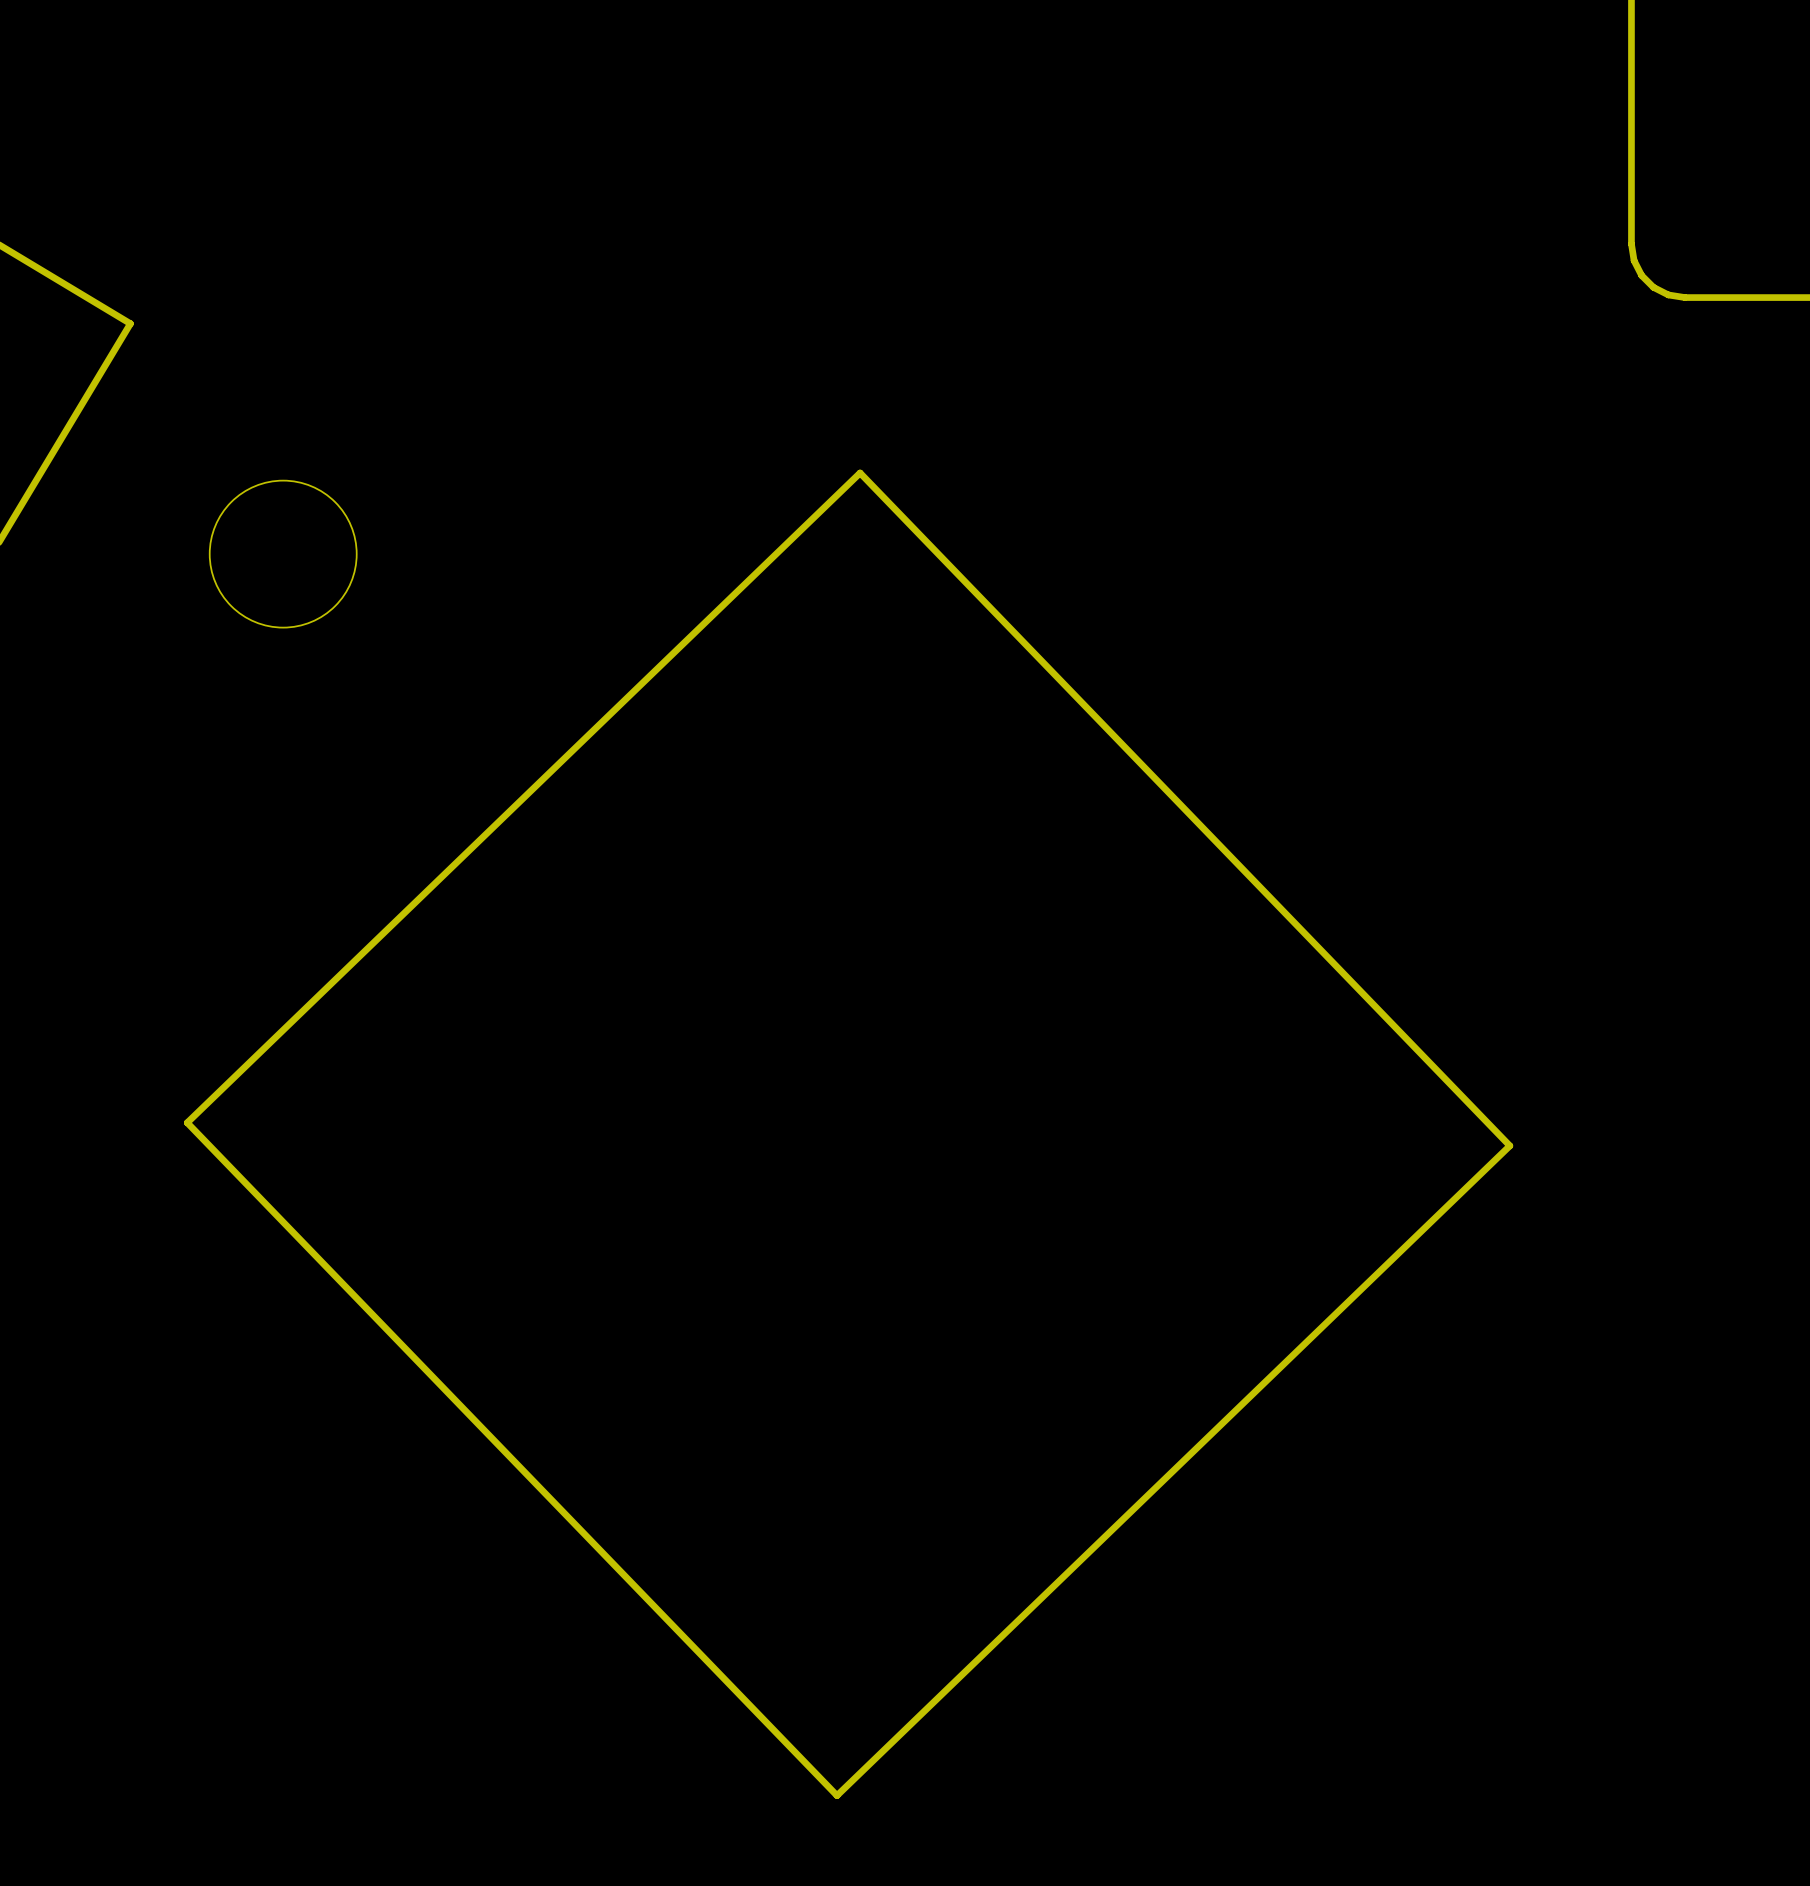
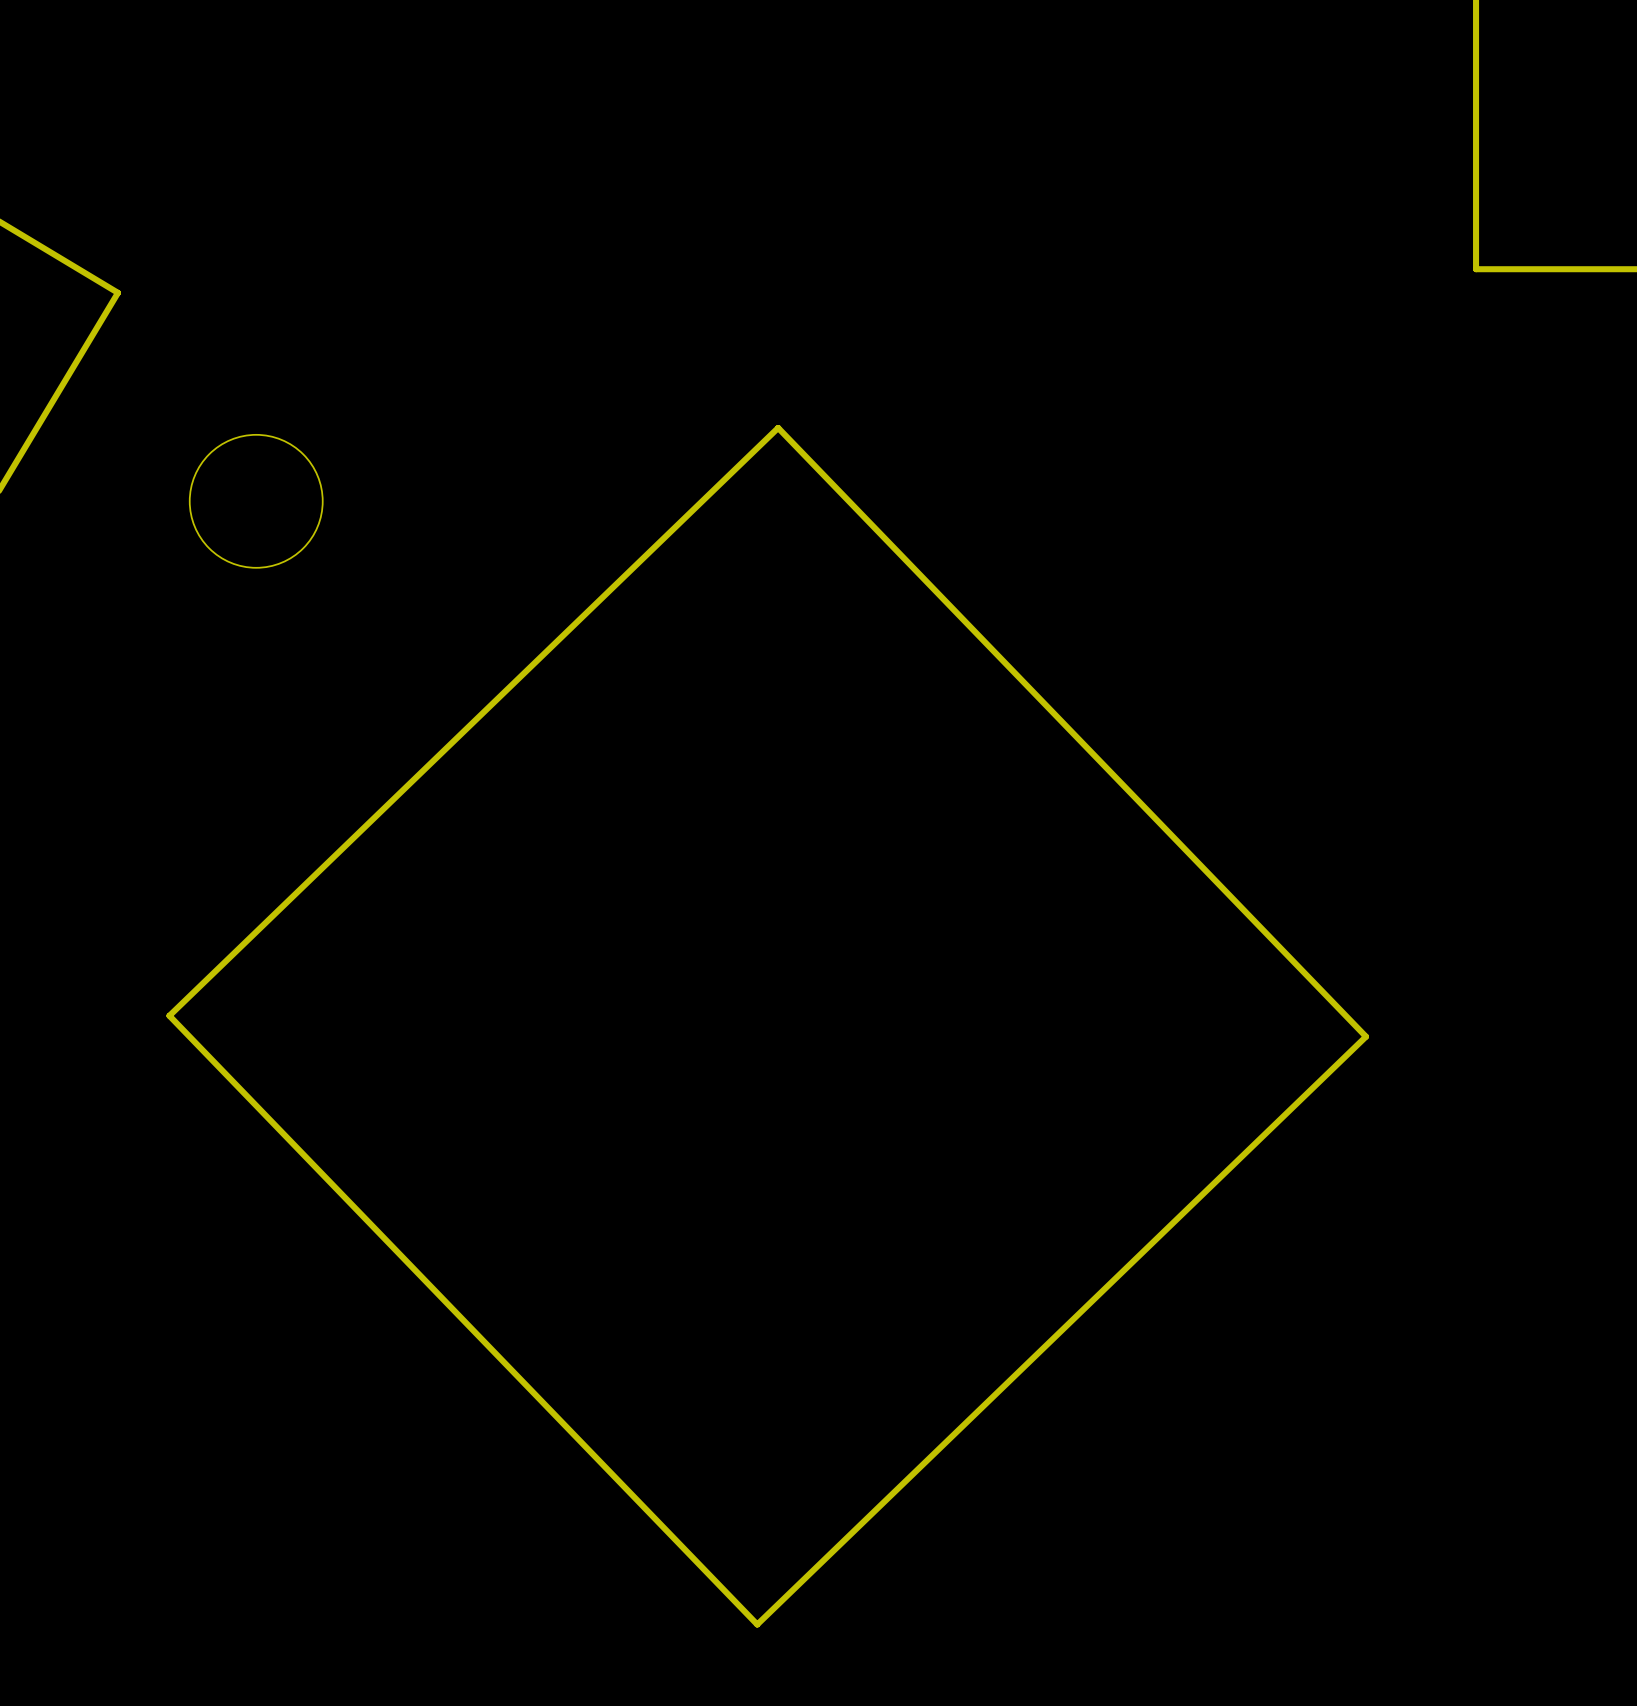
board edge: (1631, 244) (1634, 260) (1641, 275) (1653, 287) (1668, 294) (1684, 297) -> (1476, 220) (1476, 269) (1524, 269)

